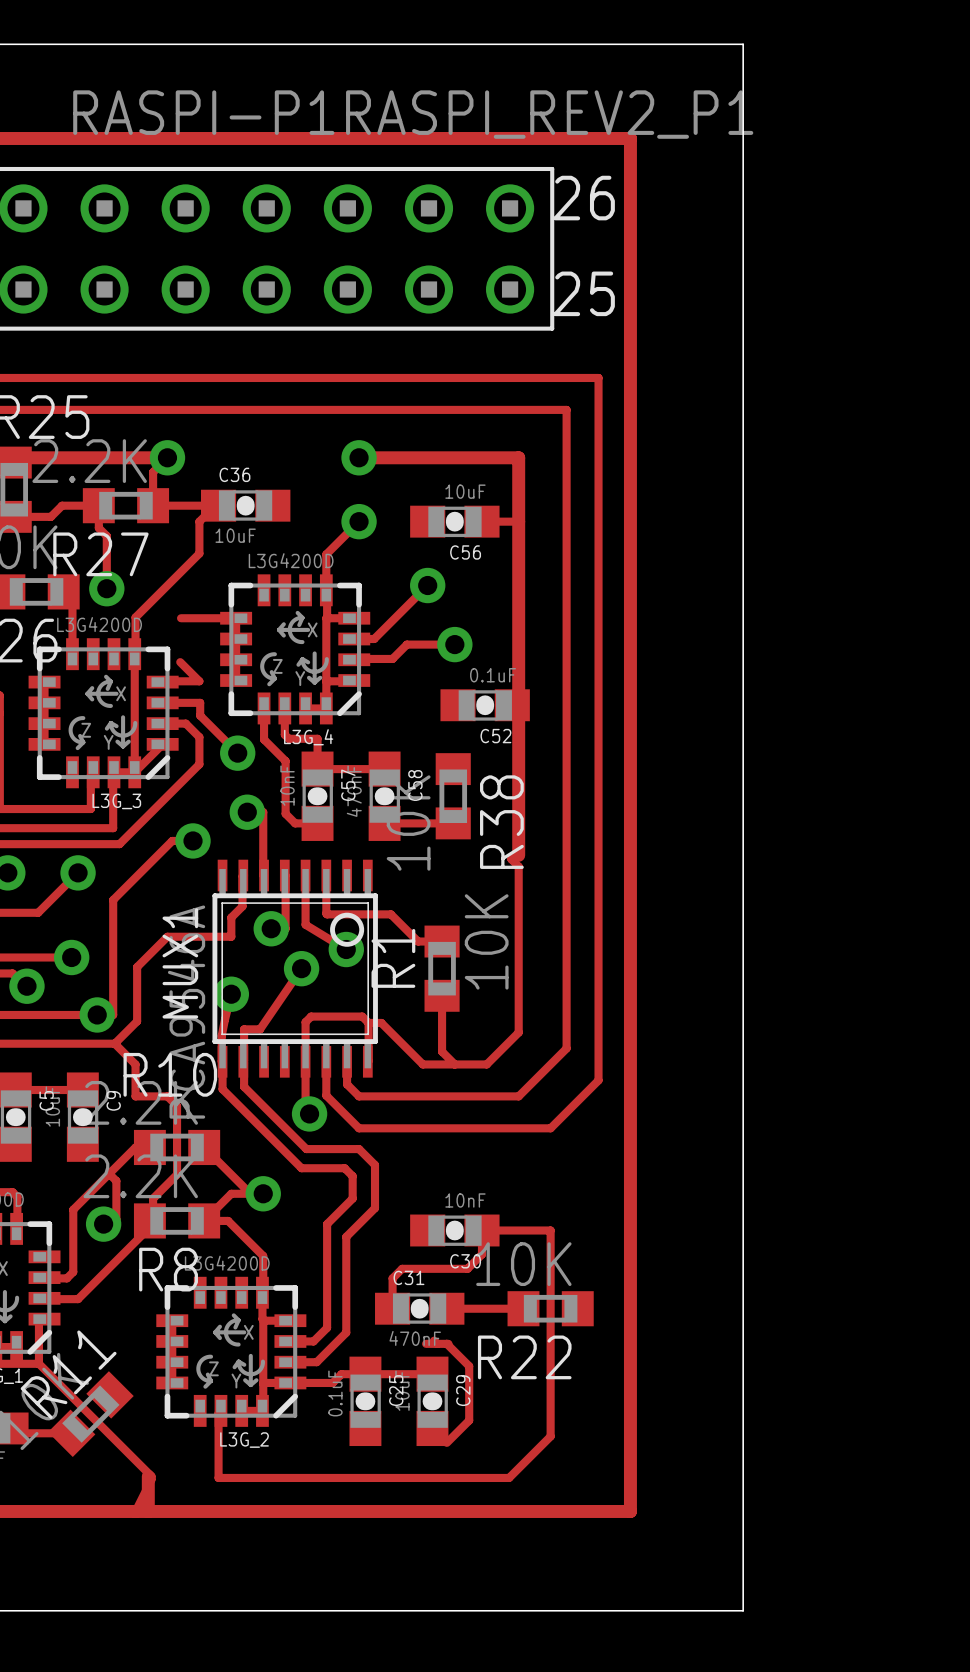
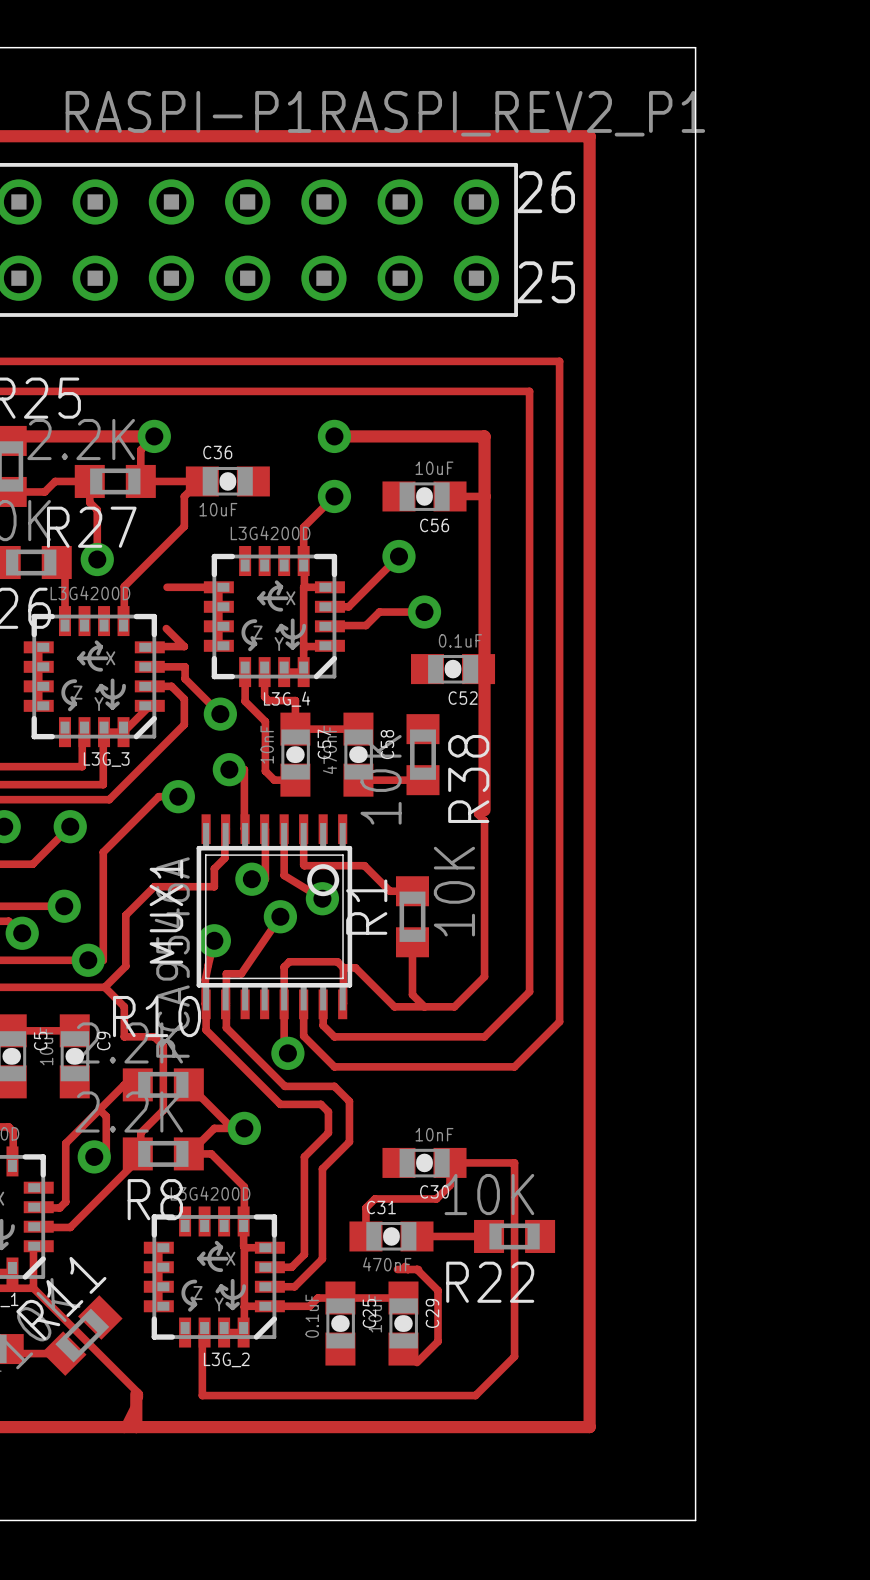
track: (134, 654) (134, 772) -> none

